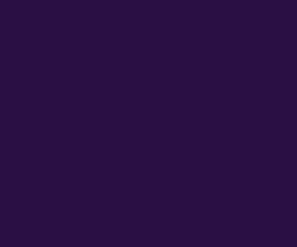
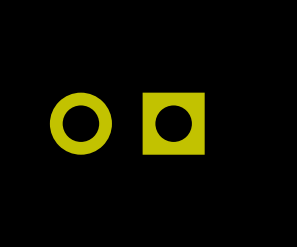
part: none -> (127, 123)

